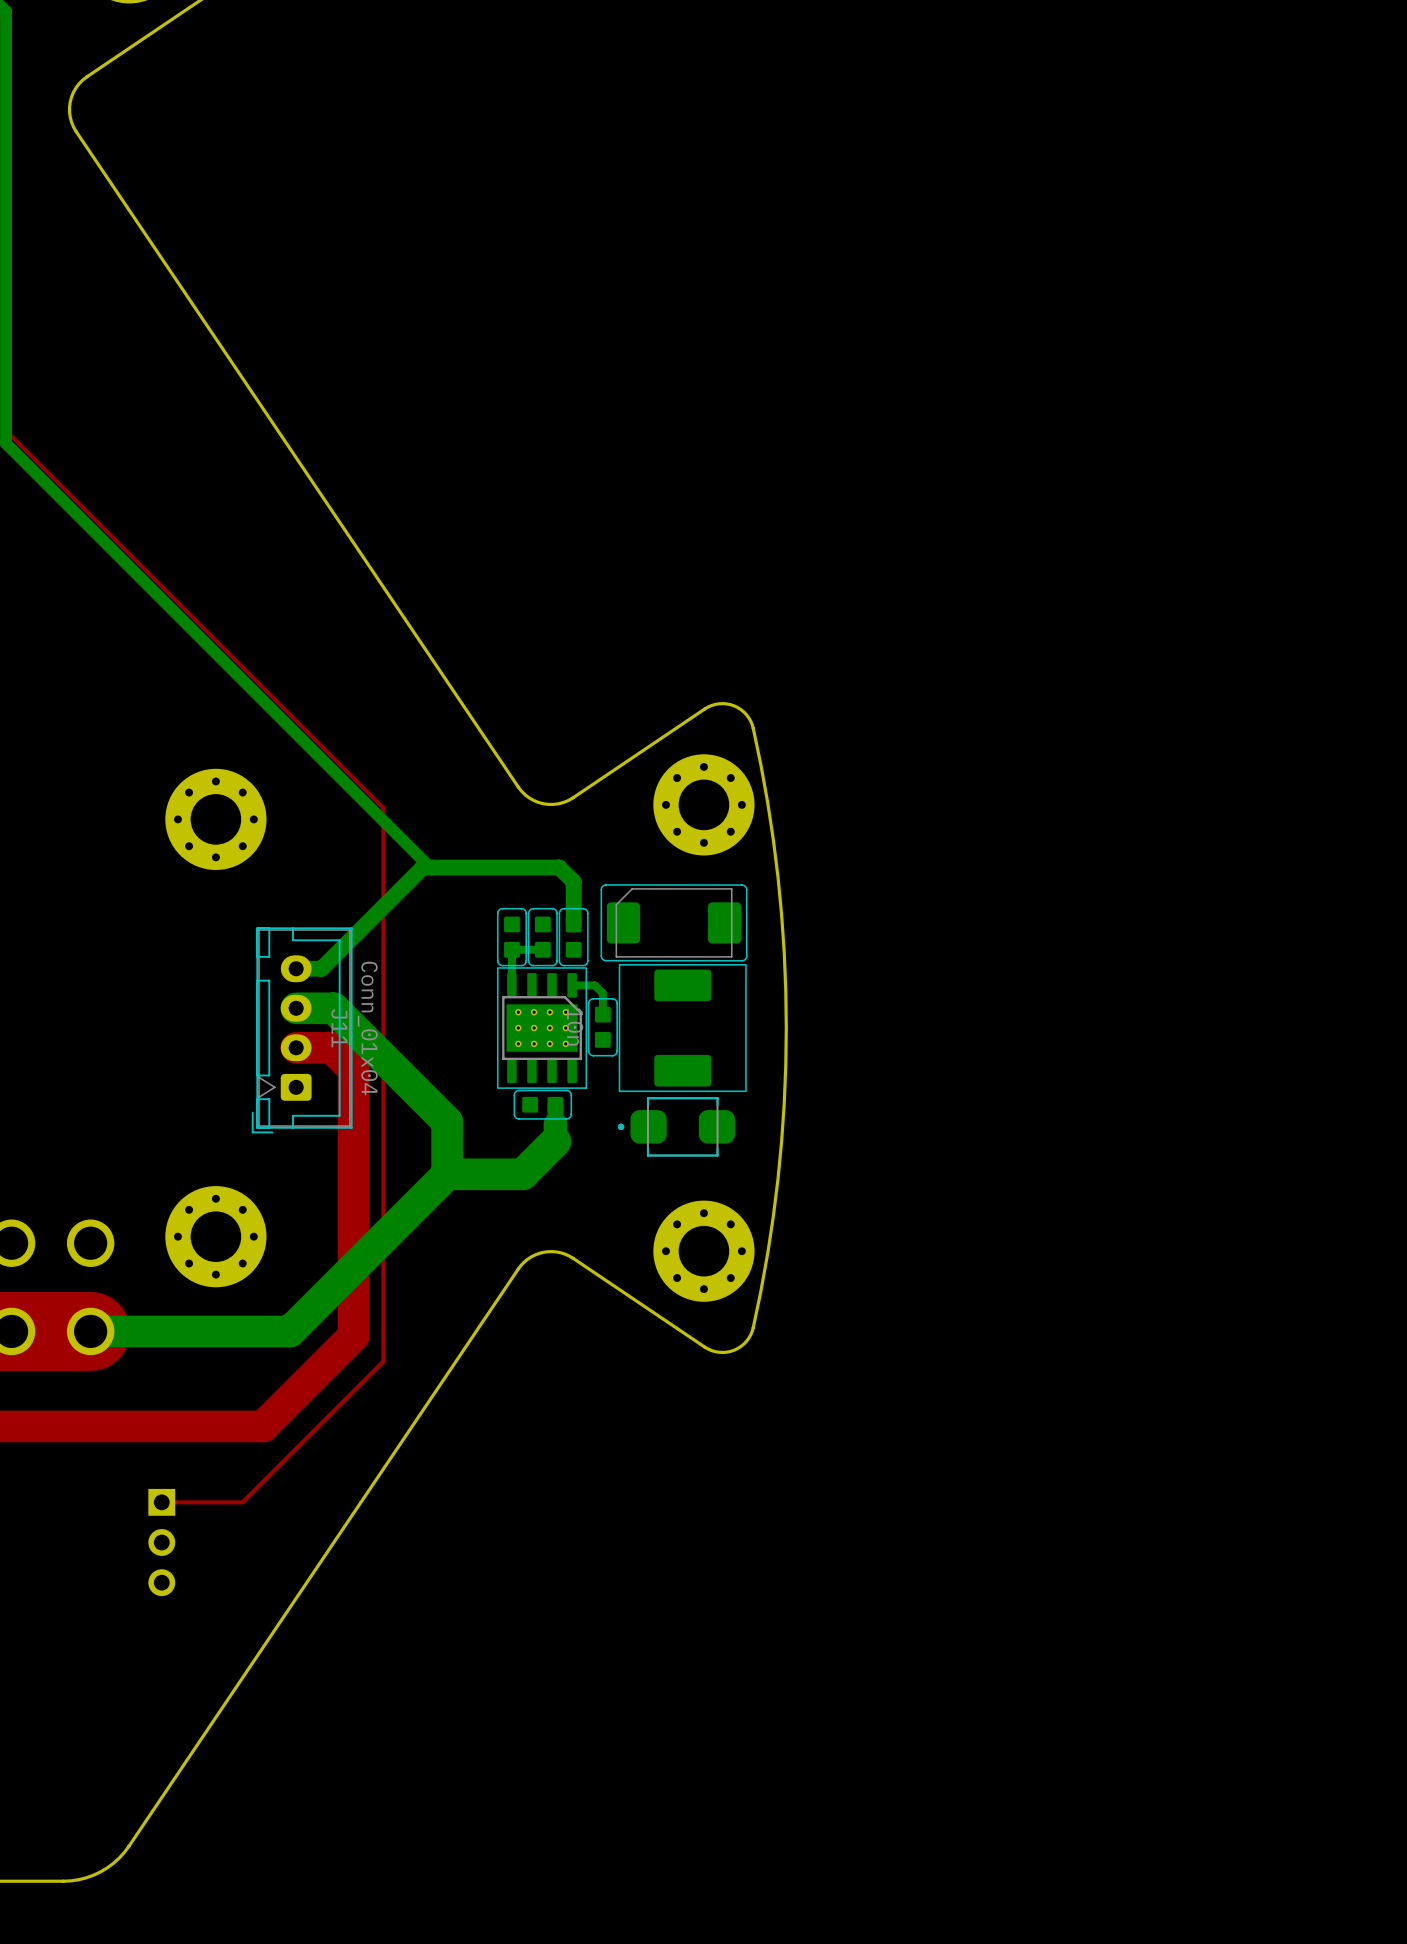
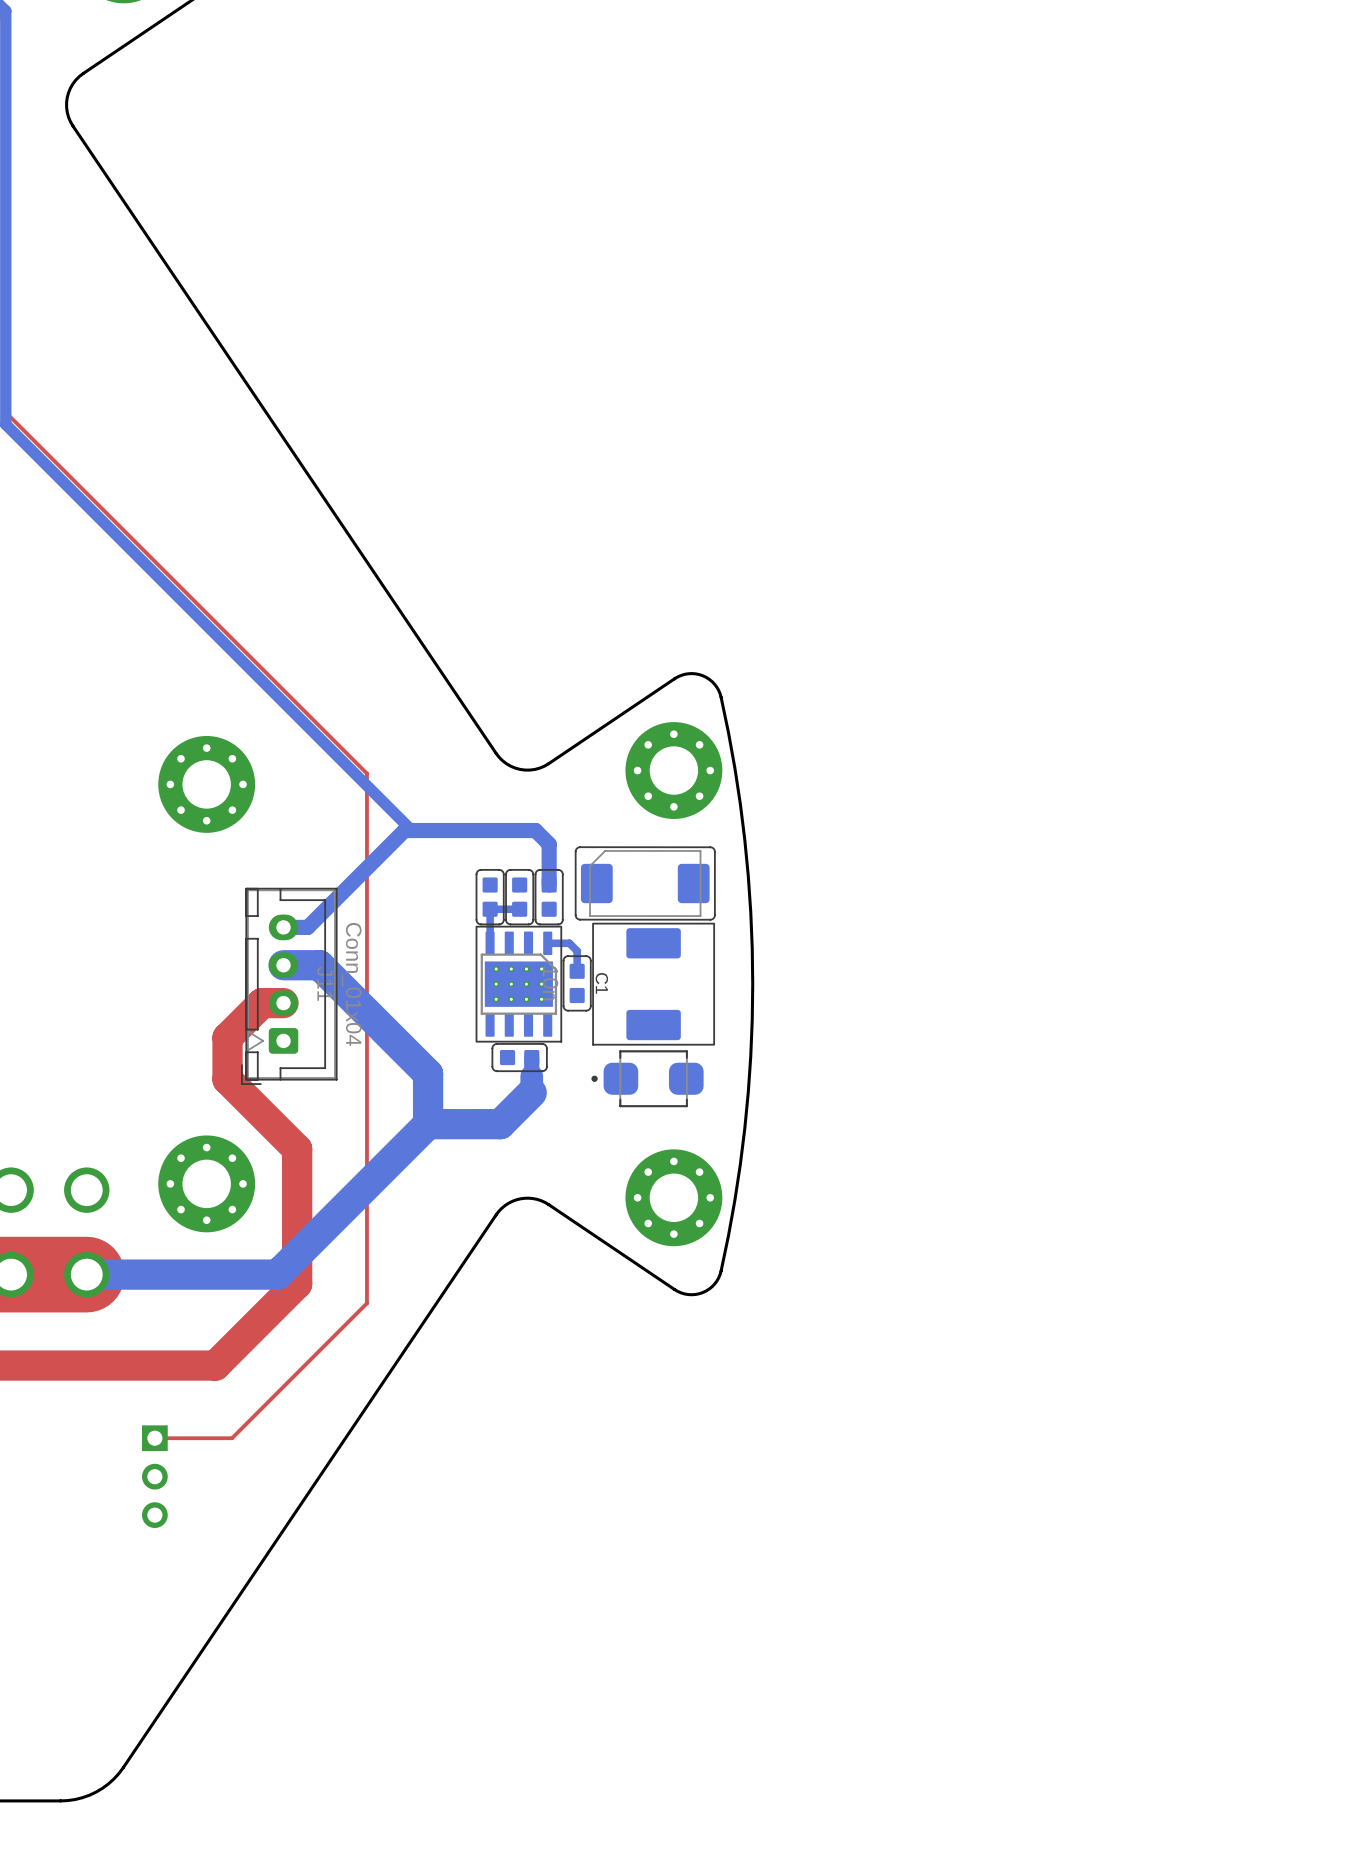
C1 name: none -> C1 (601, 983)
top track: (296, 1047) (331, 1047) (353, 1069) (353, 1335) (262, 1426) (225, 1426) -> (283, 1003) (262, 1003) (227, 1037) (227, 1079) (297, 1149) (297, 1283) (215, 1365)

